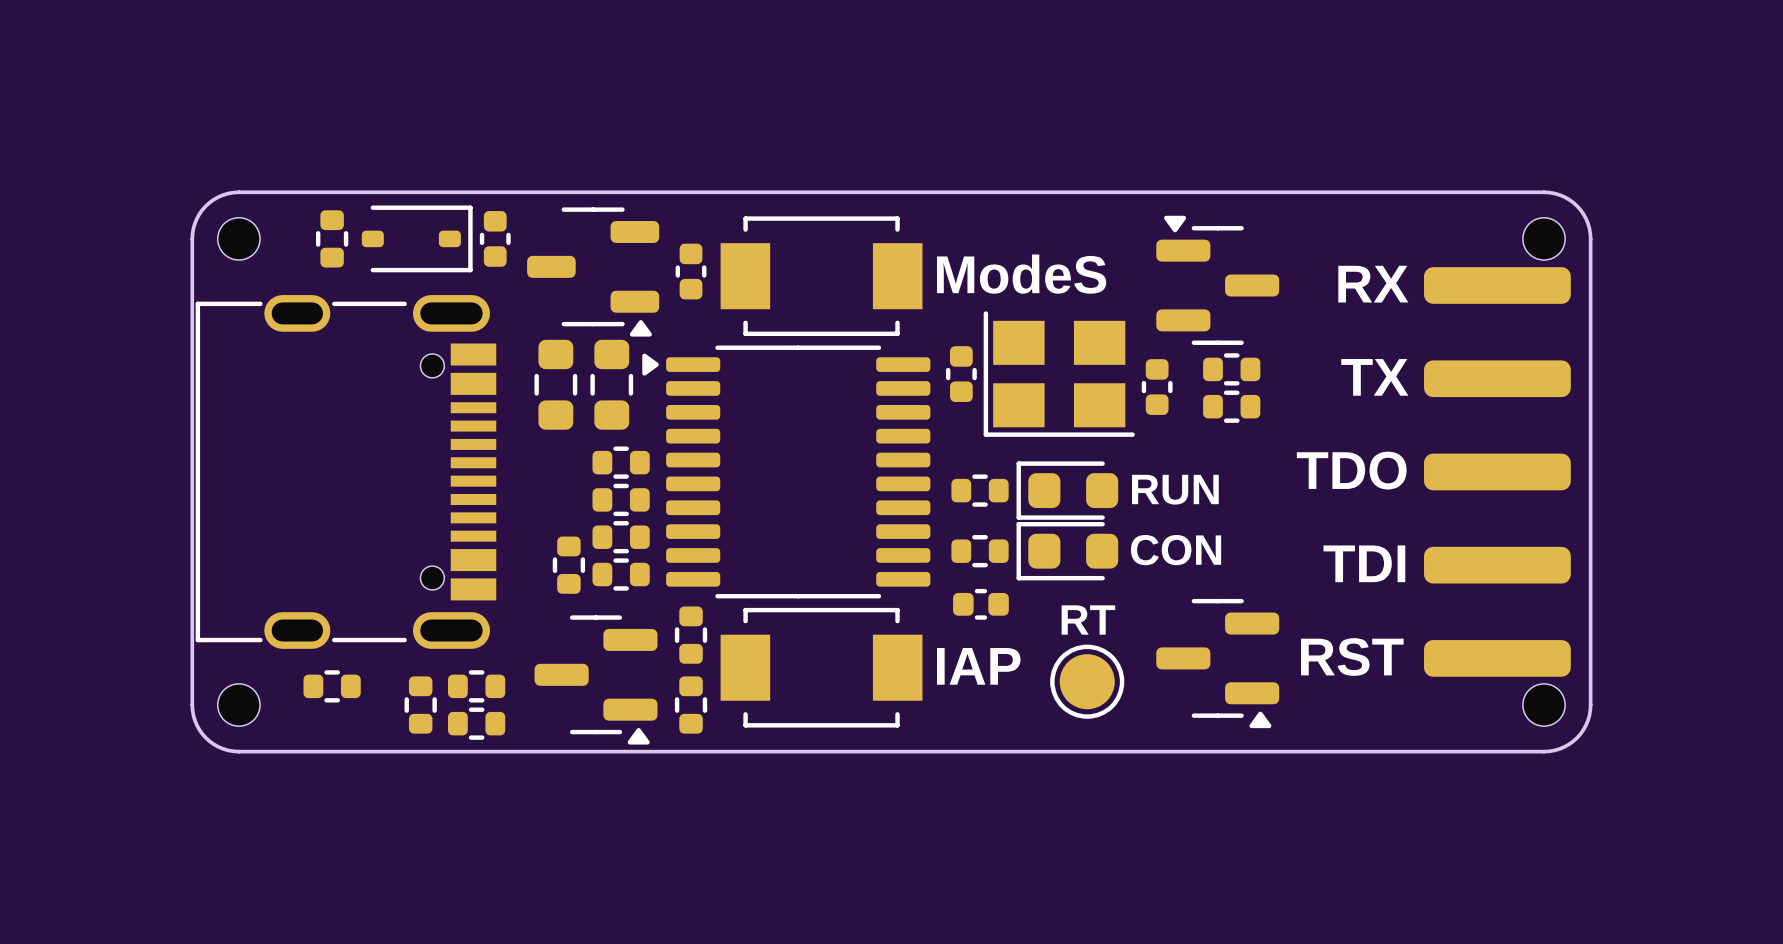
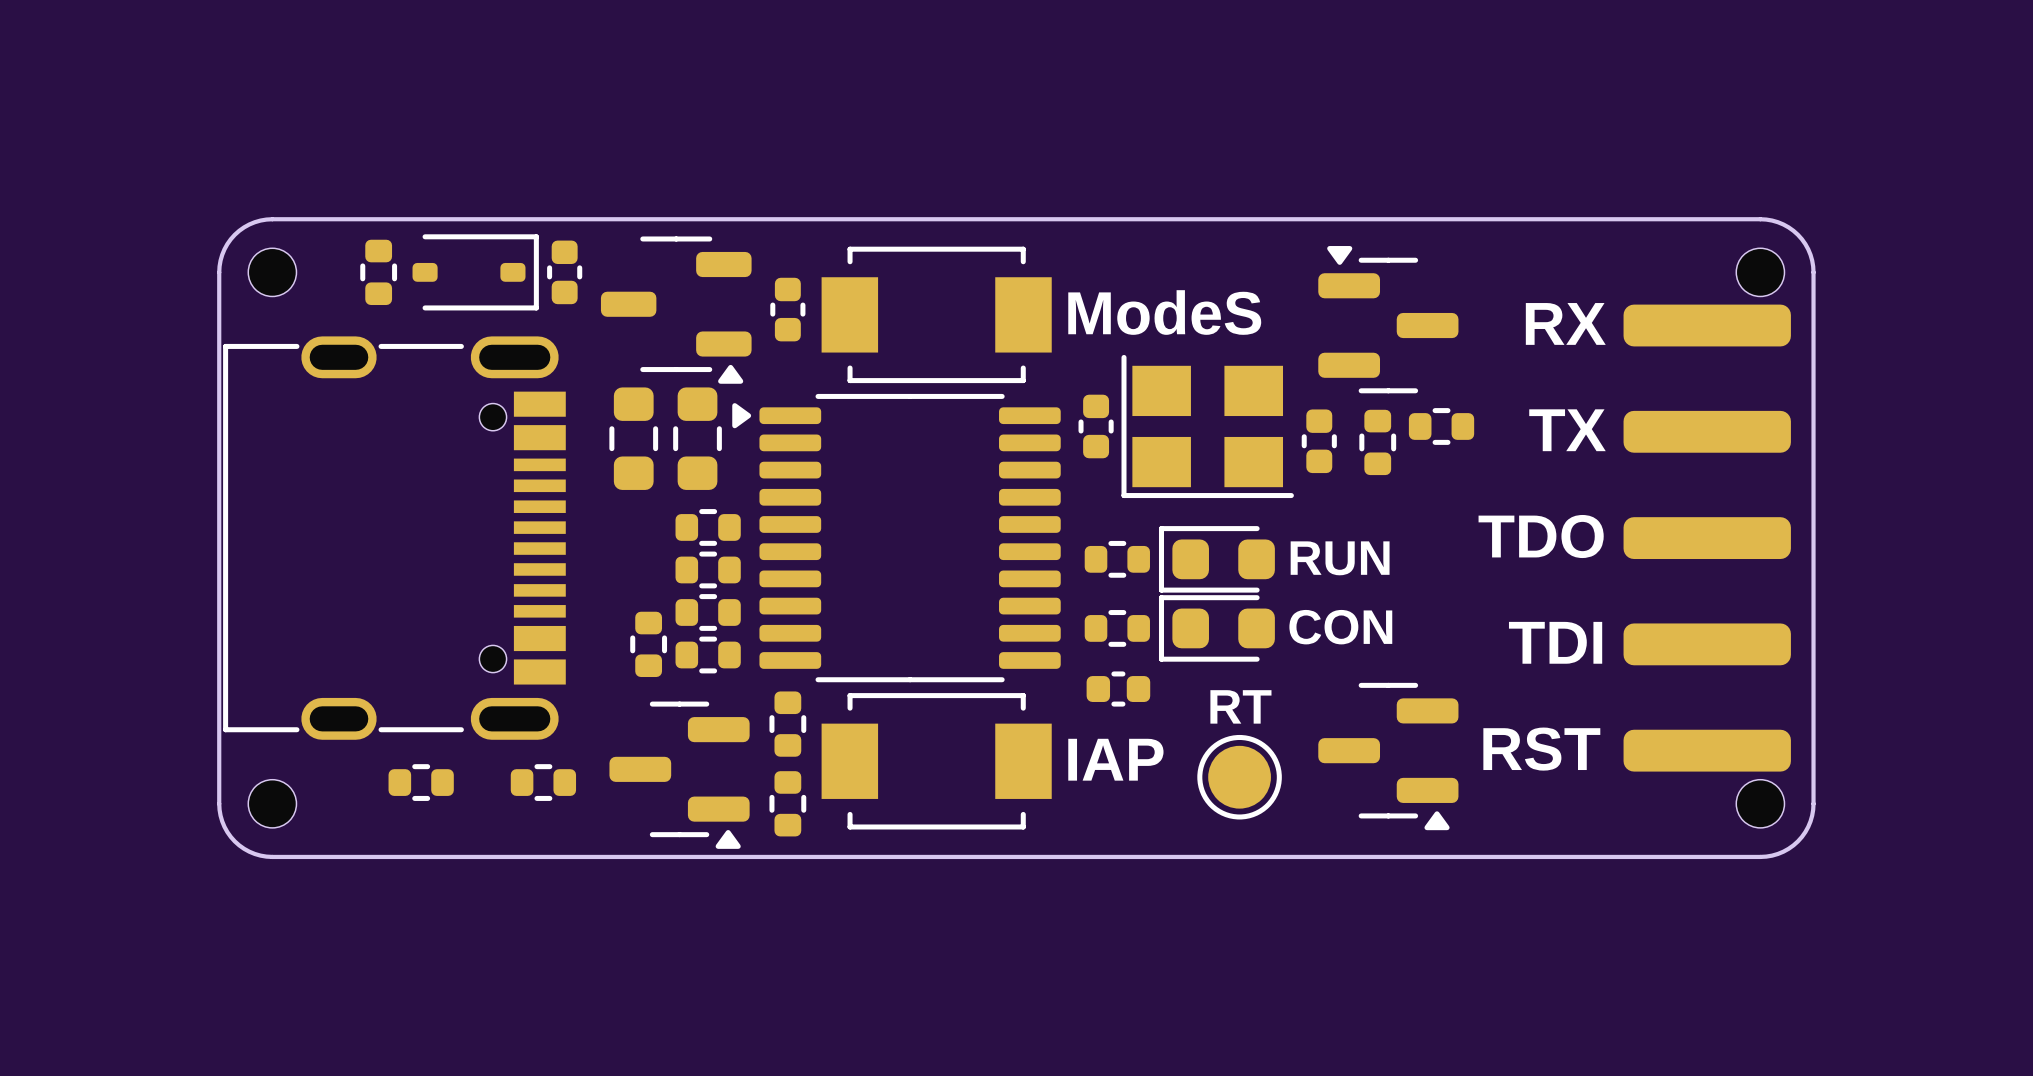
part: (1231, 369) -> none
part: none -> (1441, 426)
part: none -> (1377, 442)
part: (1231, 406) -> none
part: (332, 686) -> none
part: none -> (421, 782)
part: (420, 705) -> none
part: (476, 723) -> none

